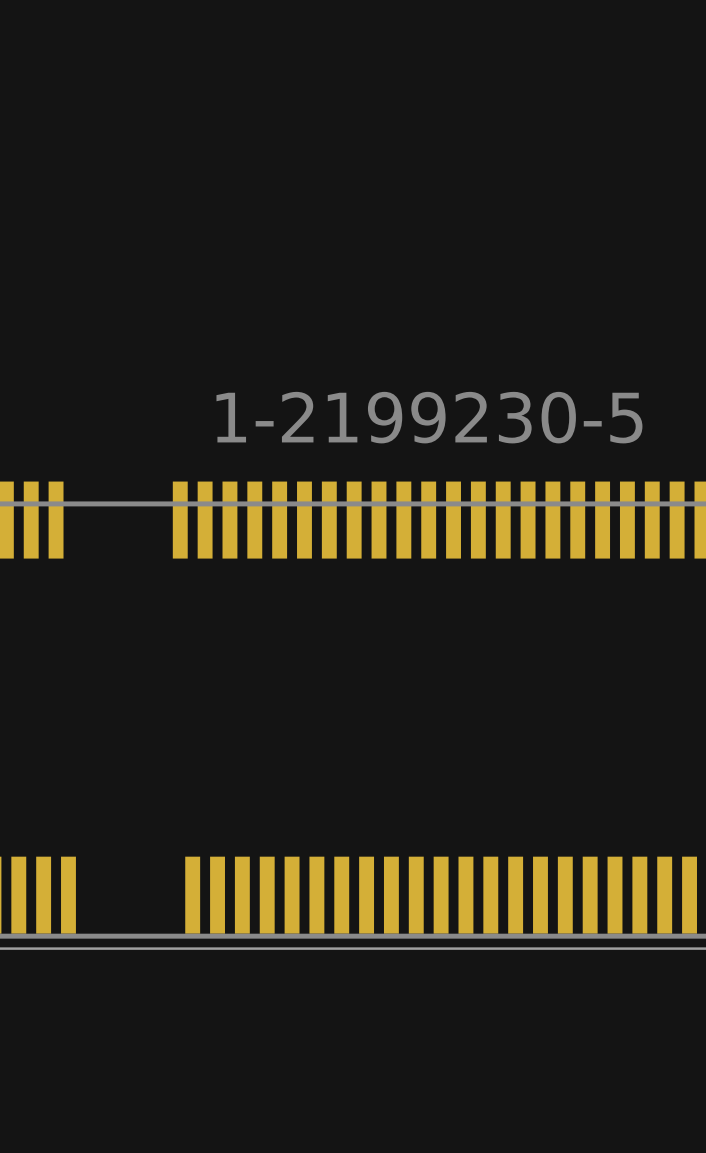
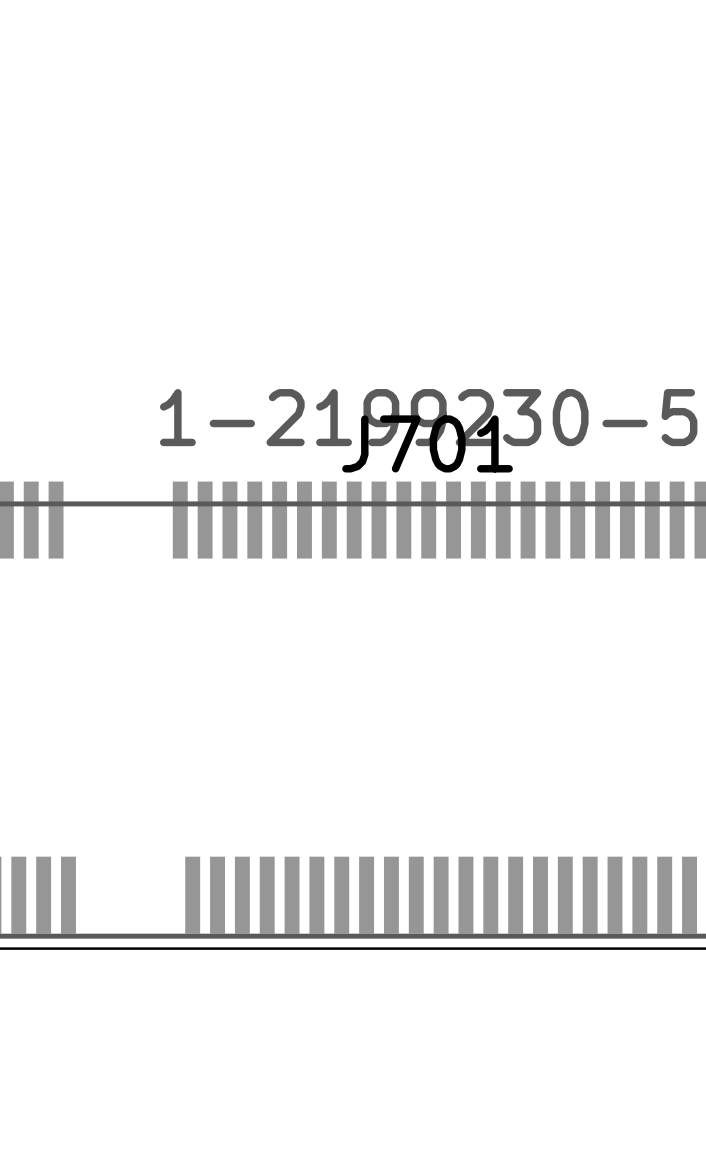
J701 name: none -> J701 (427, 443)

